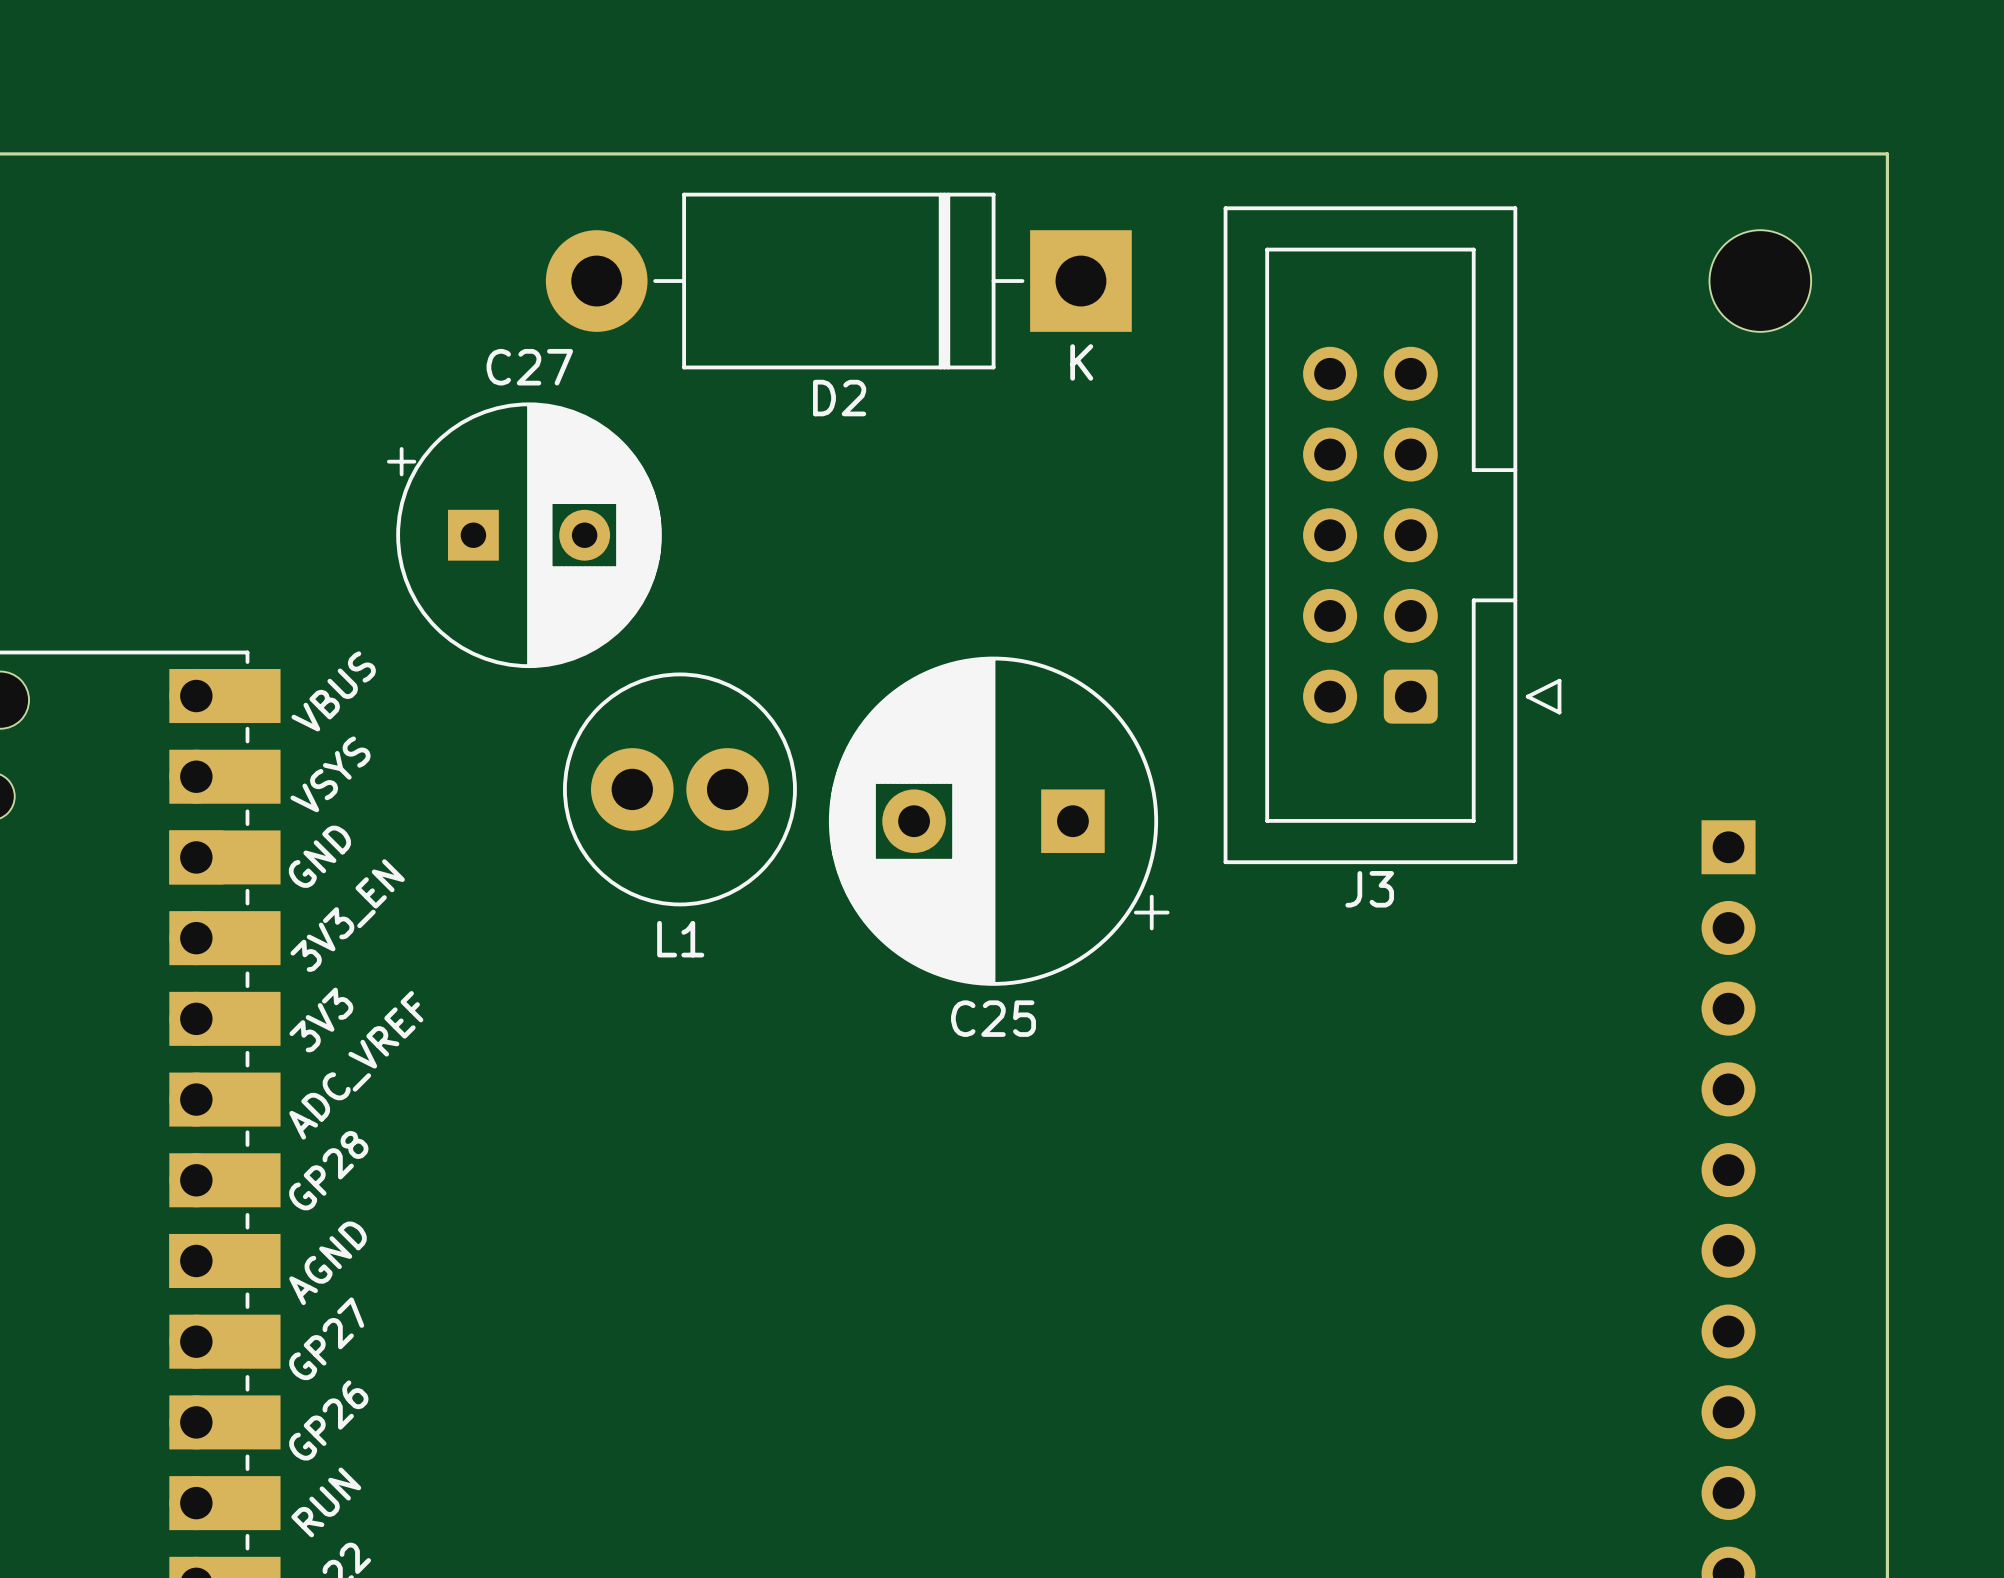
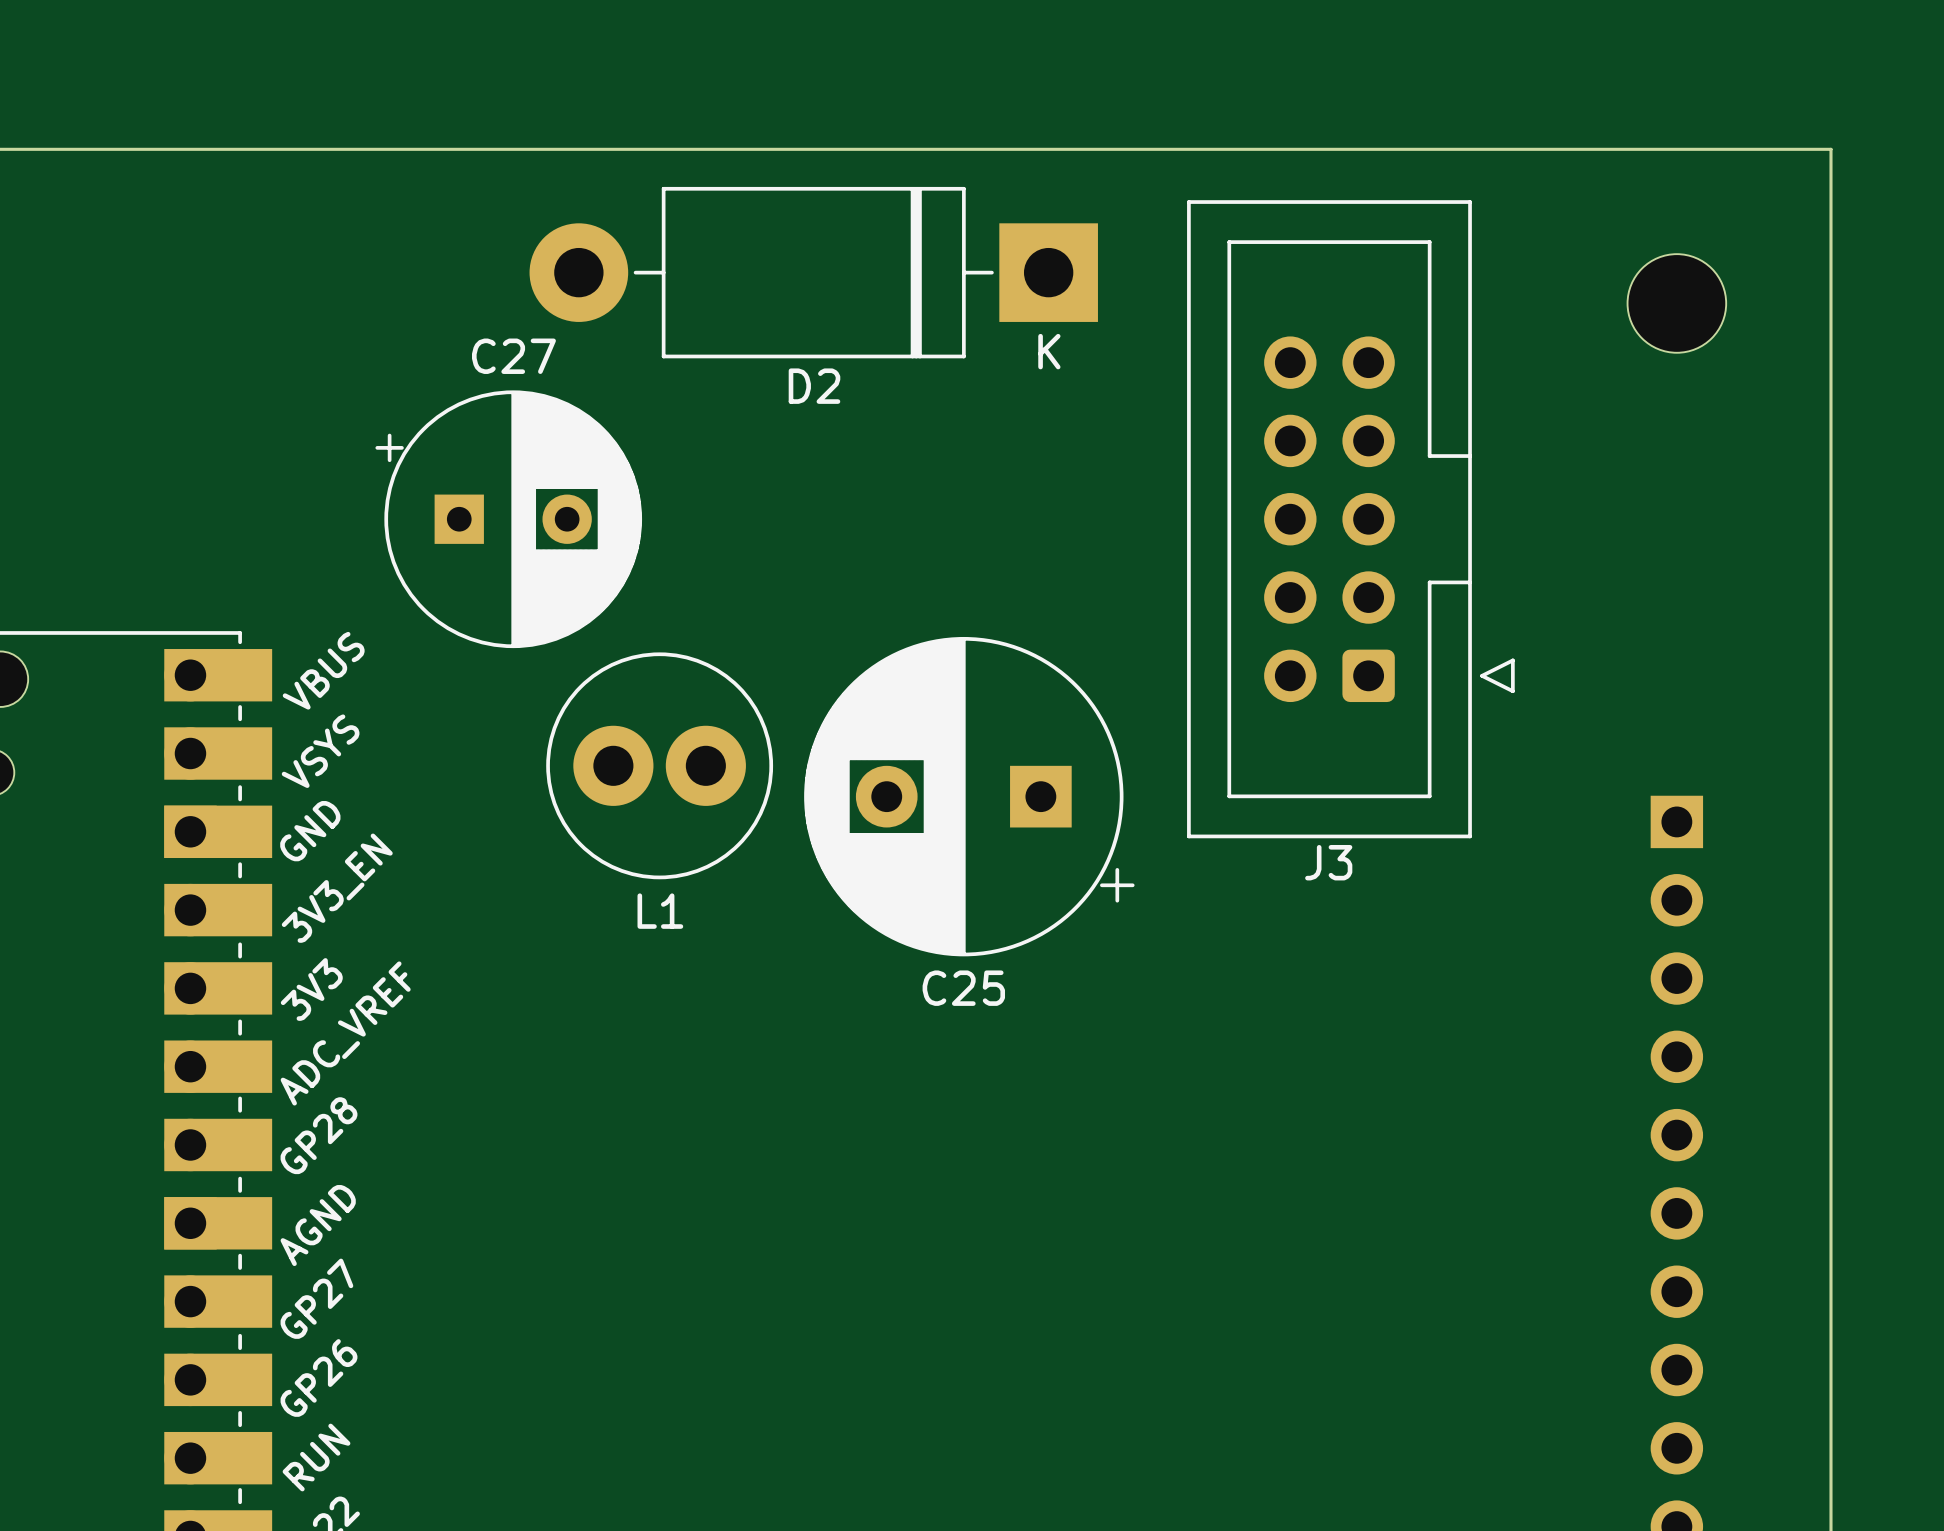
part position: (1760, 281) -> (1676, 303)

